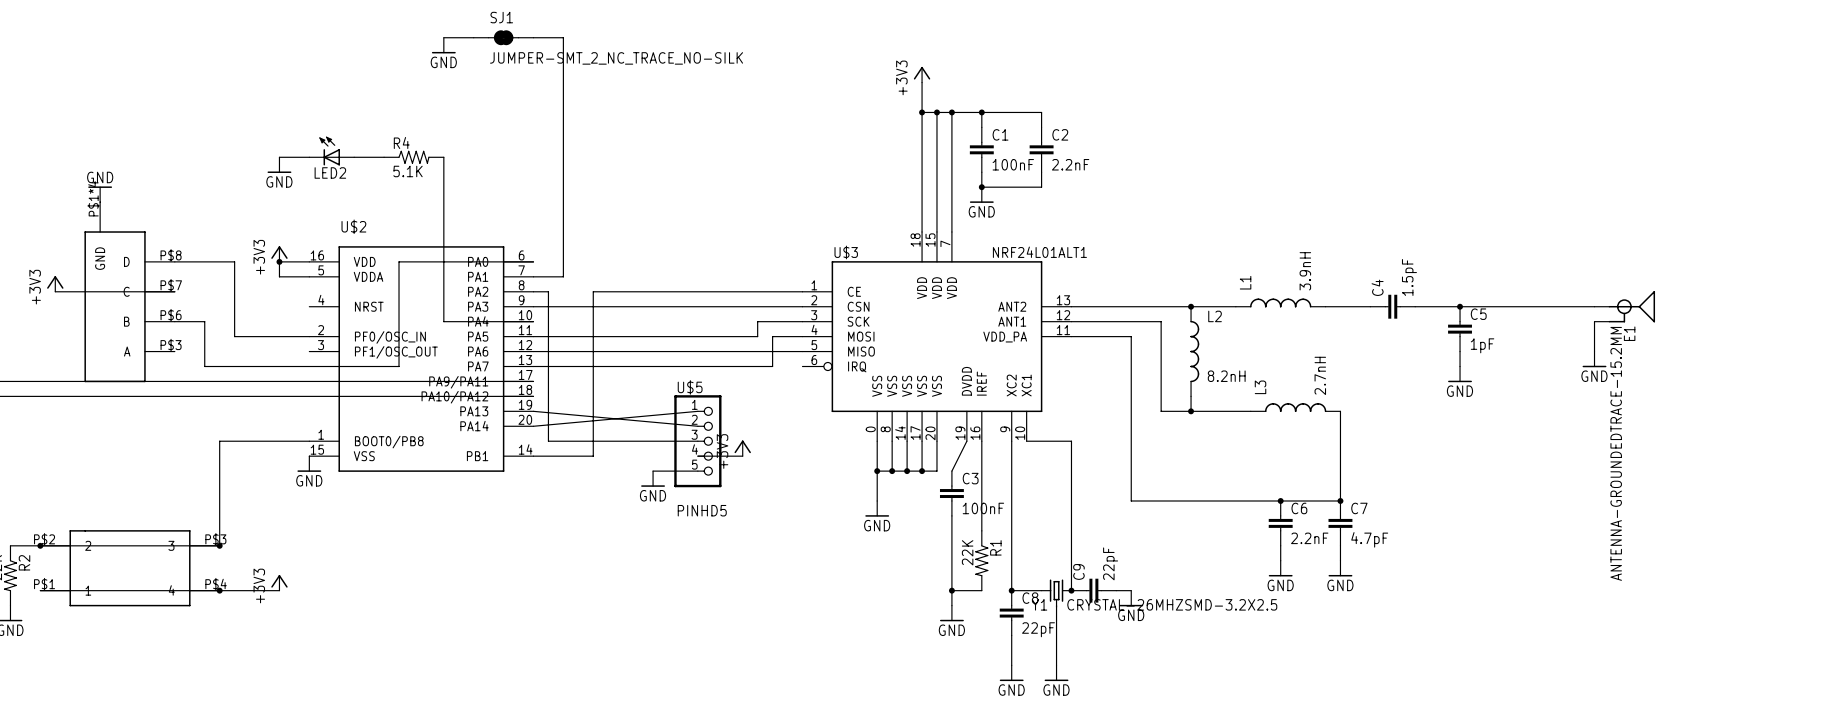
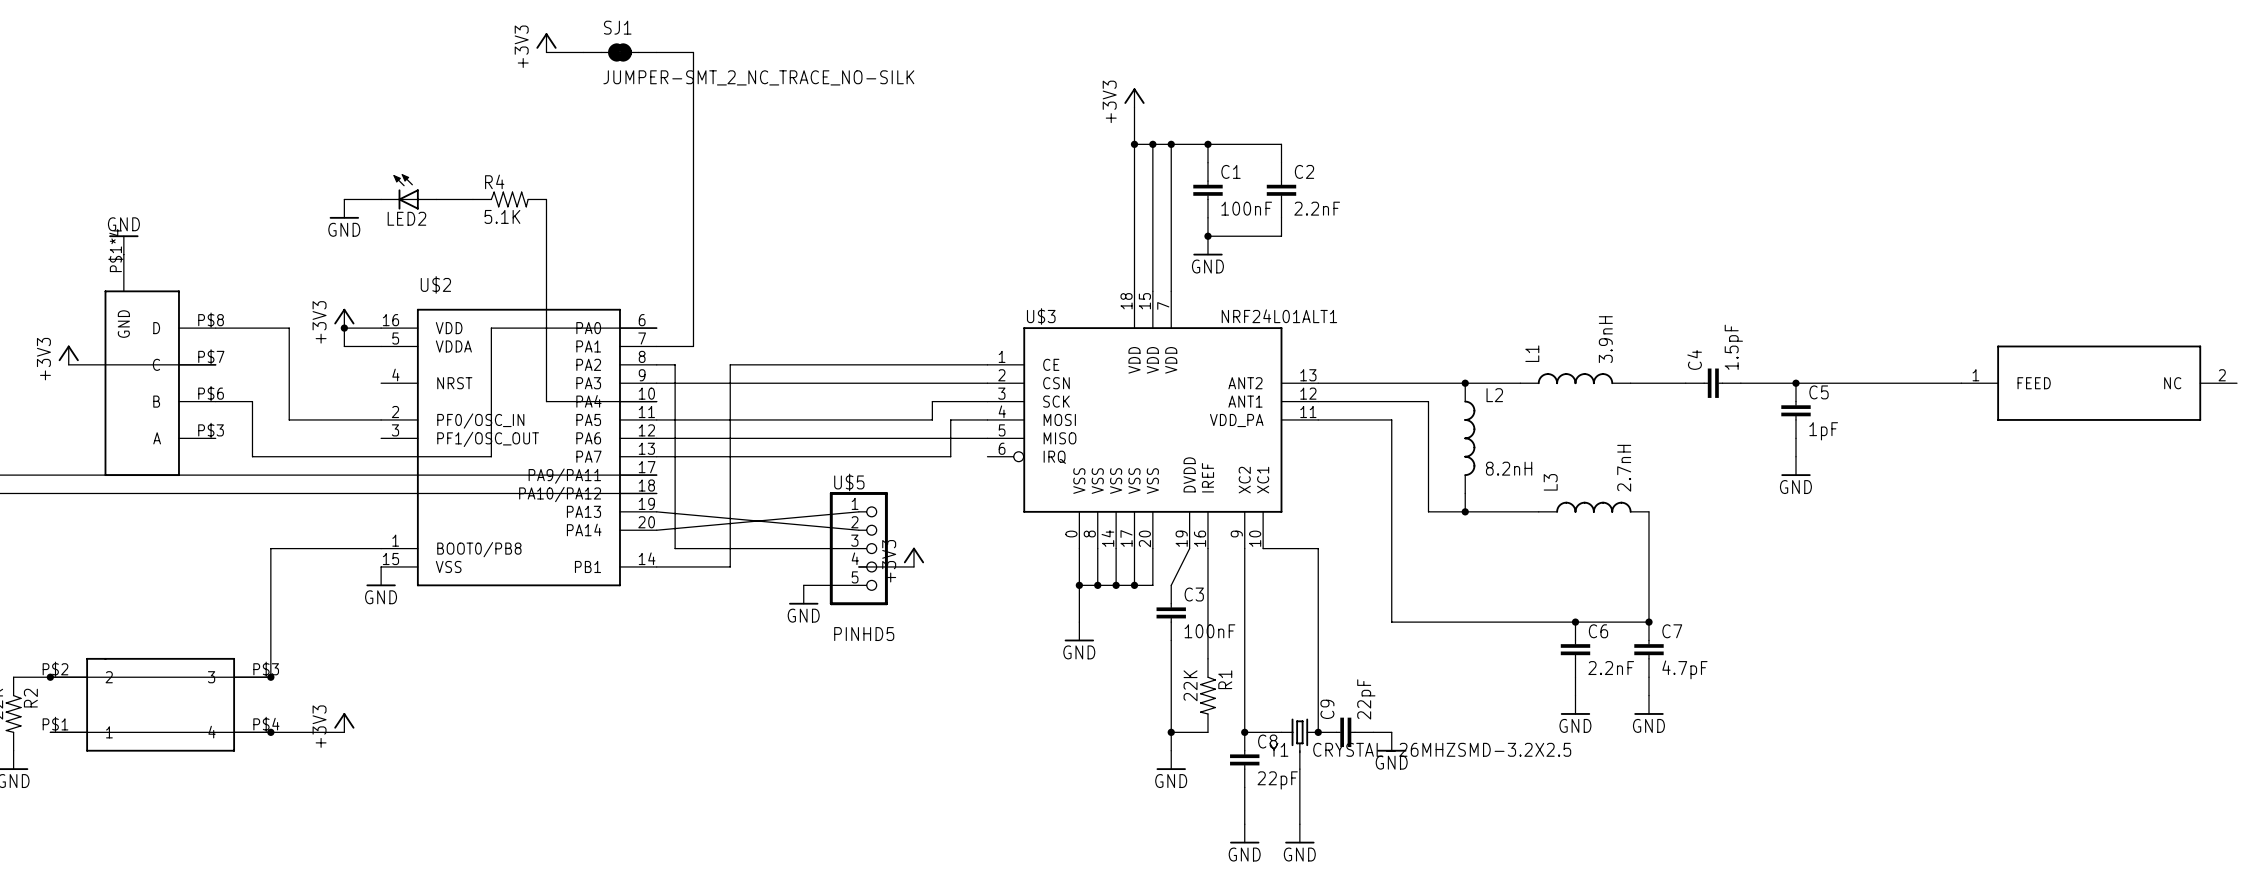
power symbol: none -> +3V3 (546, 42)
power symbol: GND (443, 45) -> none
E1: ANTENNA-GROUNDEDTRACE-15.2MM (1624, 306) -> none
part: none -> (2099, 383)
wire: (1594, 321) (1594, 351) -> none
power symbol: GND (1594, 359) -> none

